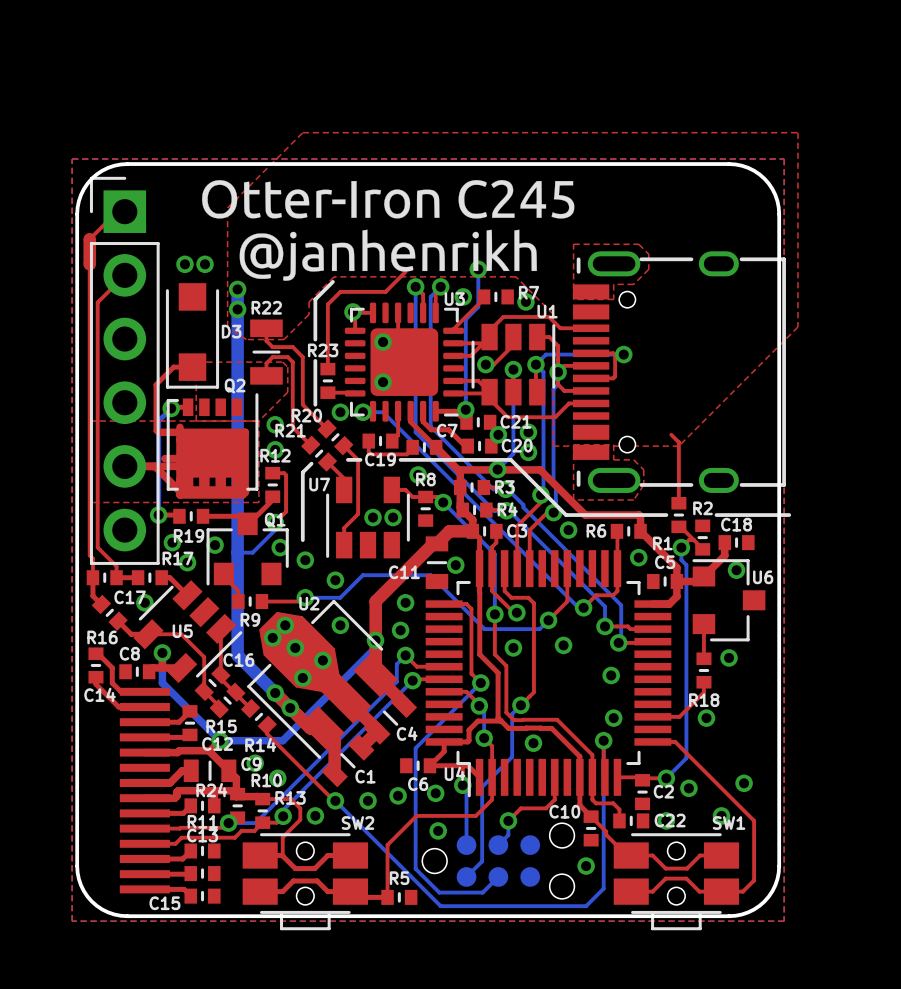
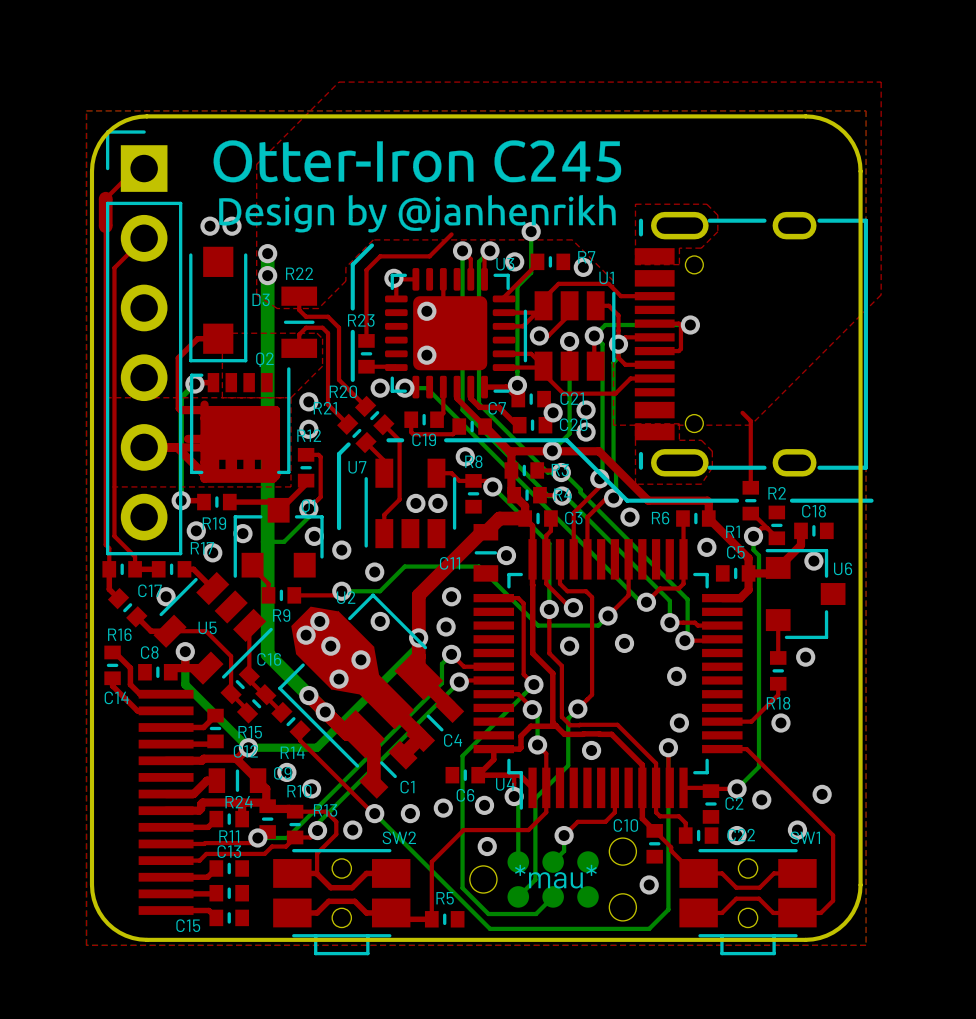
drawing shape: [202, 180, 575, 281] -> [213, 140, 622, 233]
text: none -> *mau* (555, 876)

